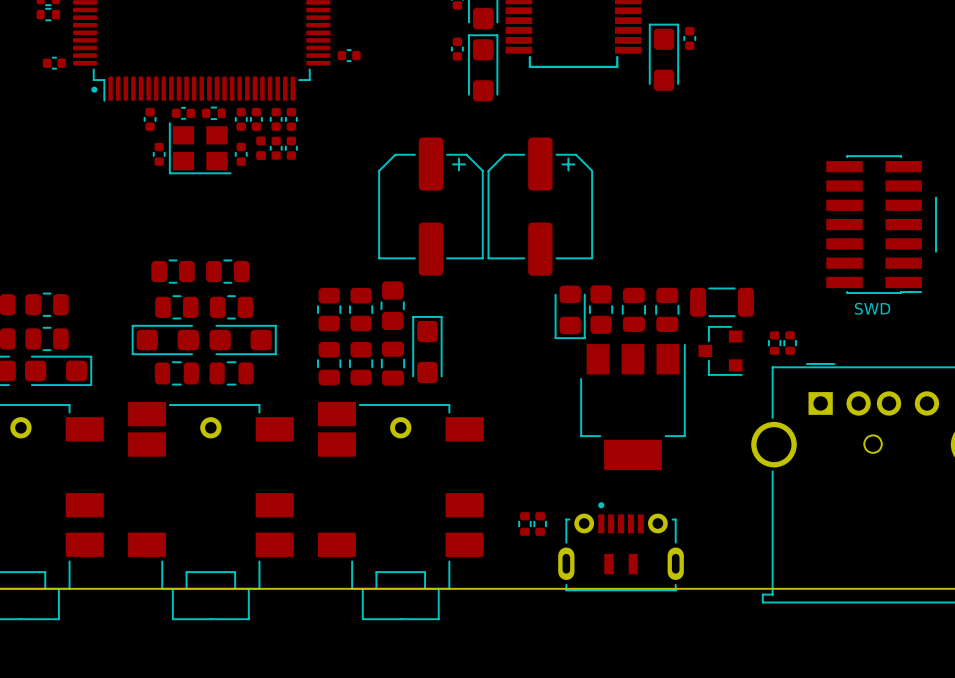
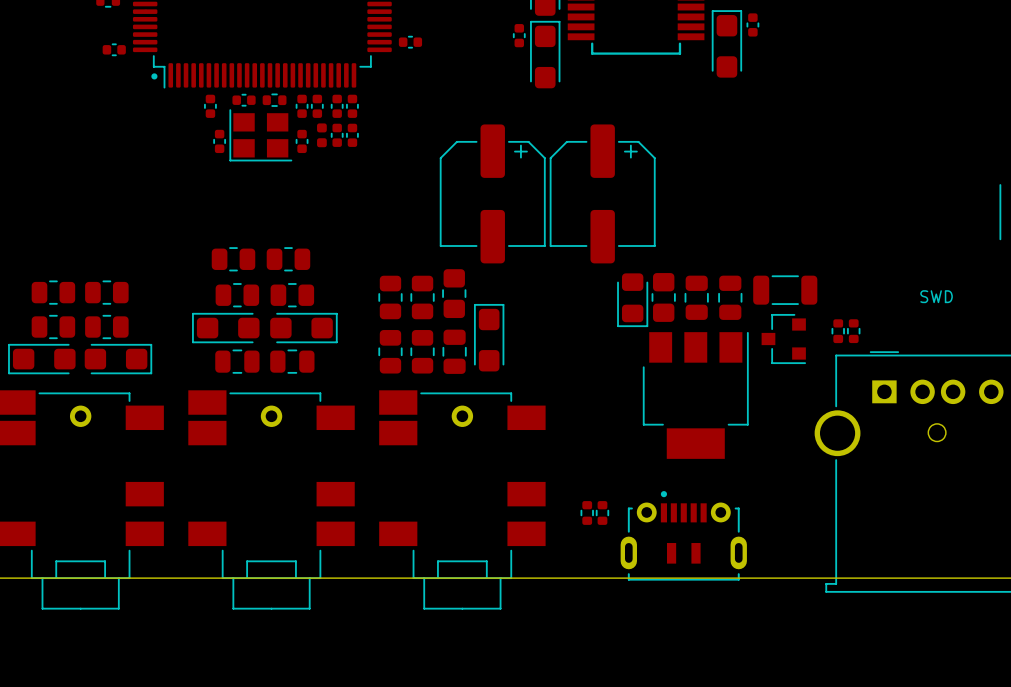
part: (874, 224) -> none

